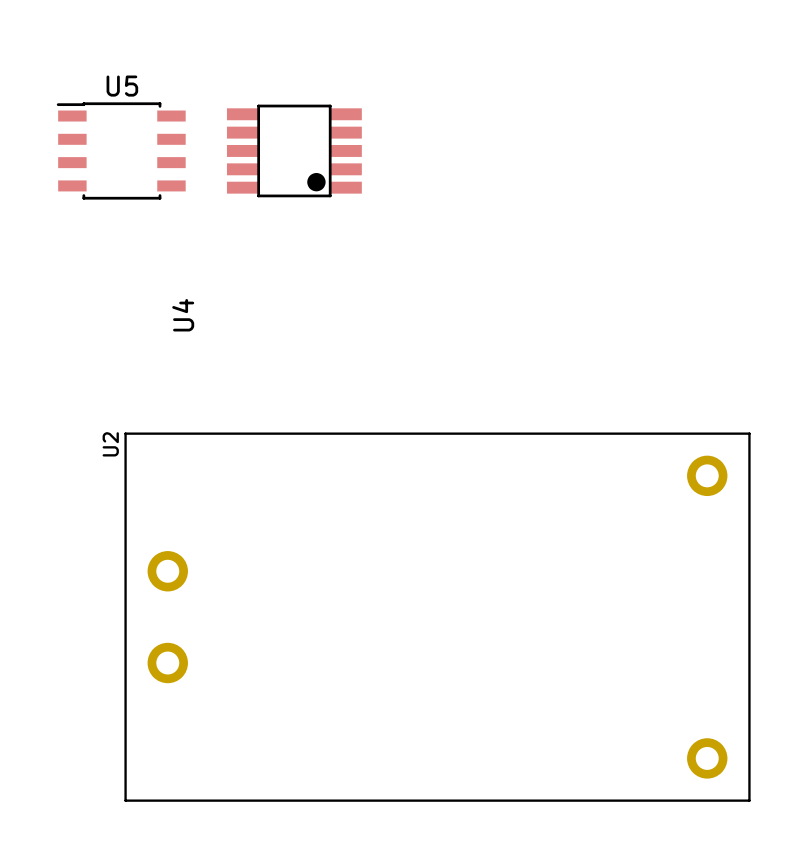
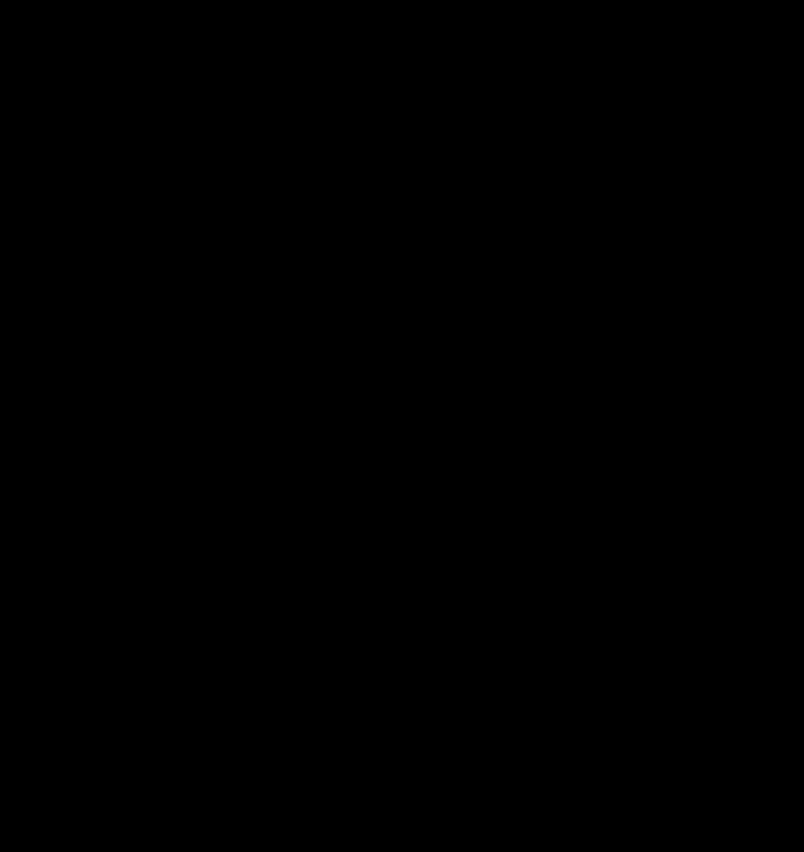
U5: (121, 150) -> none
U4: (294, 150) -> none
U2: (437, 617) -> none

